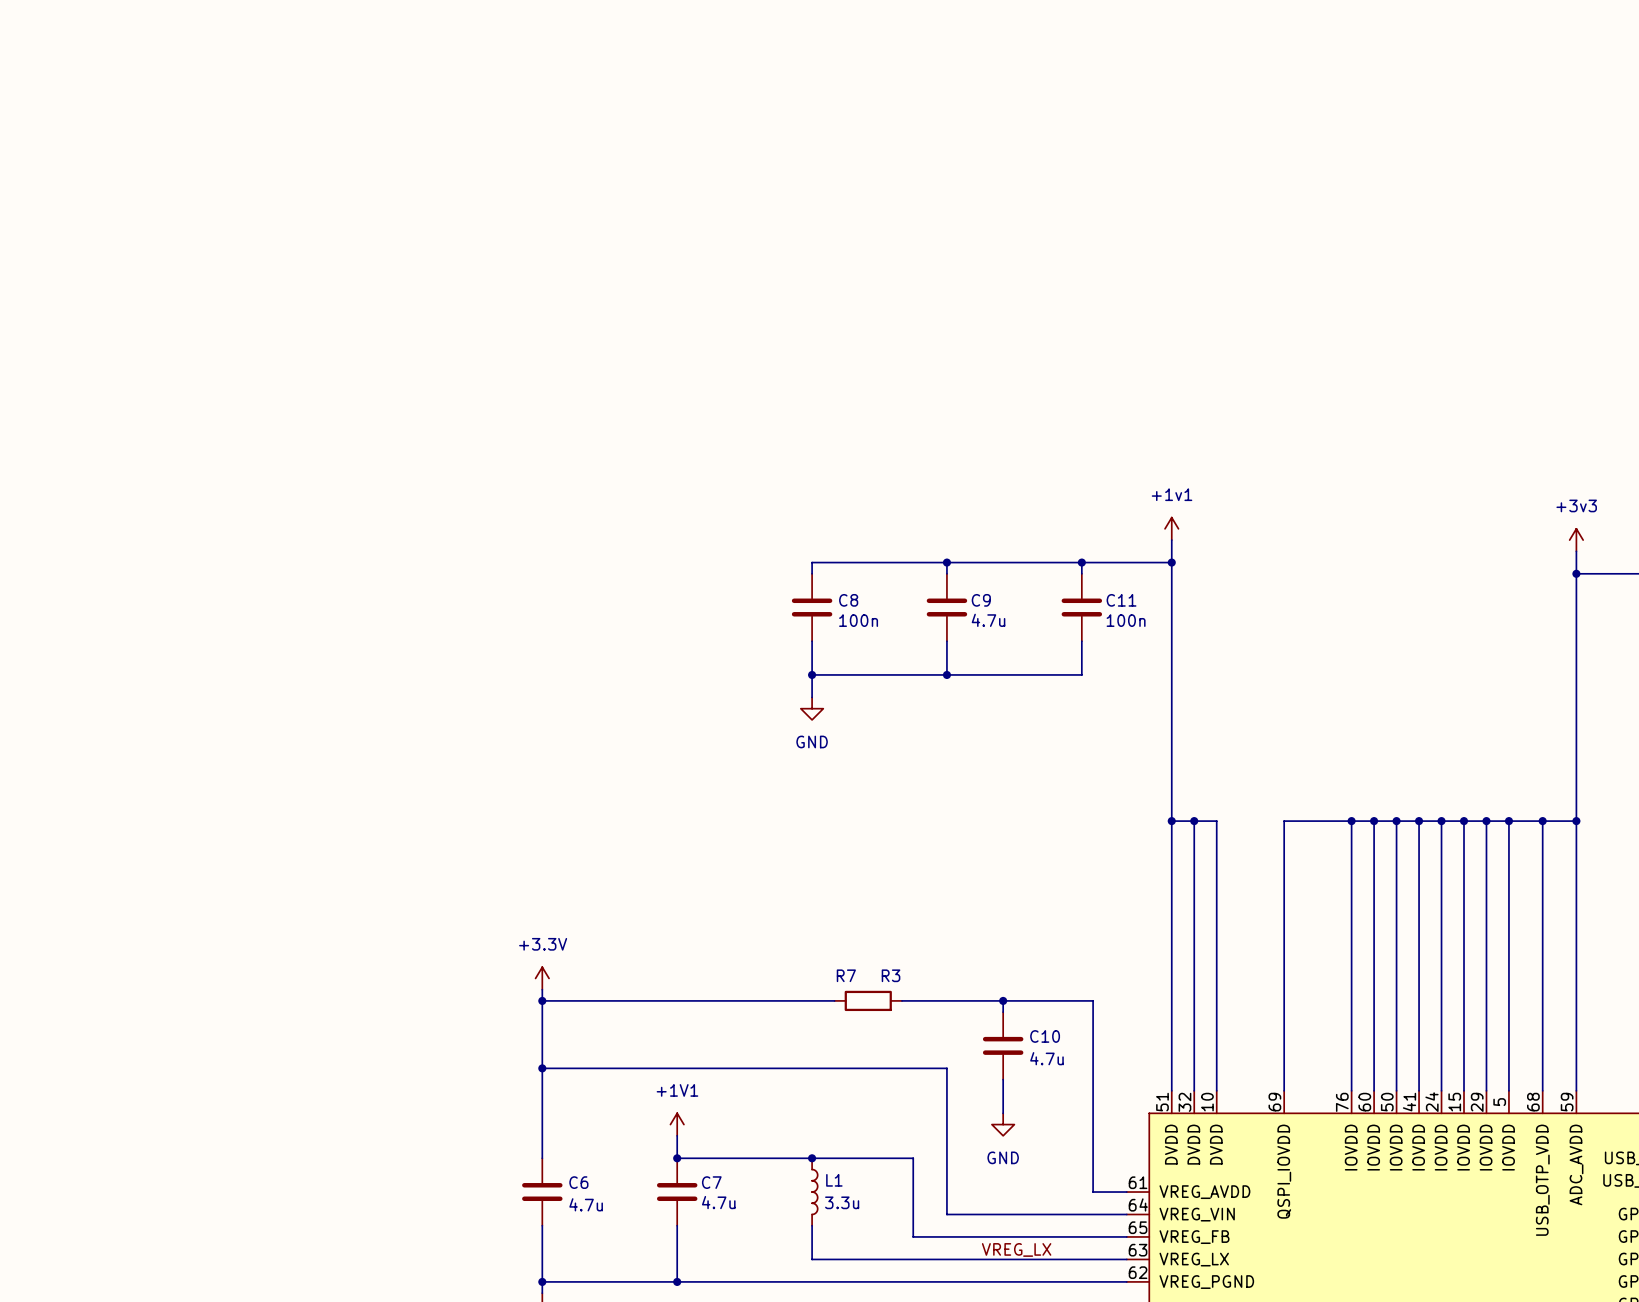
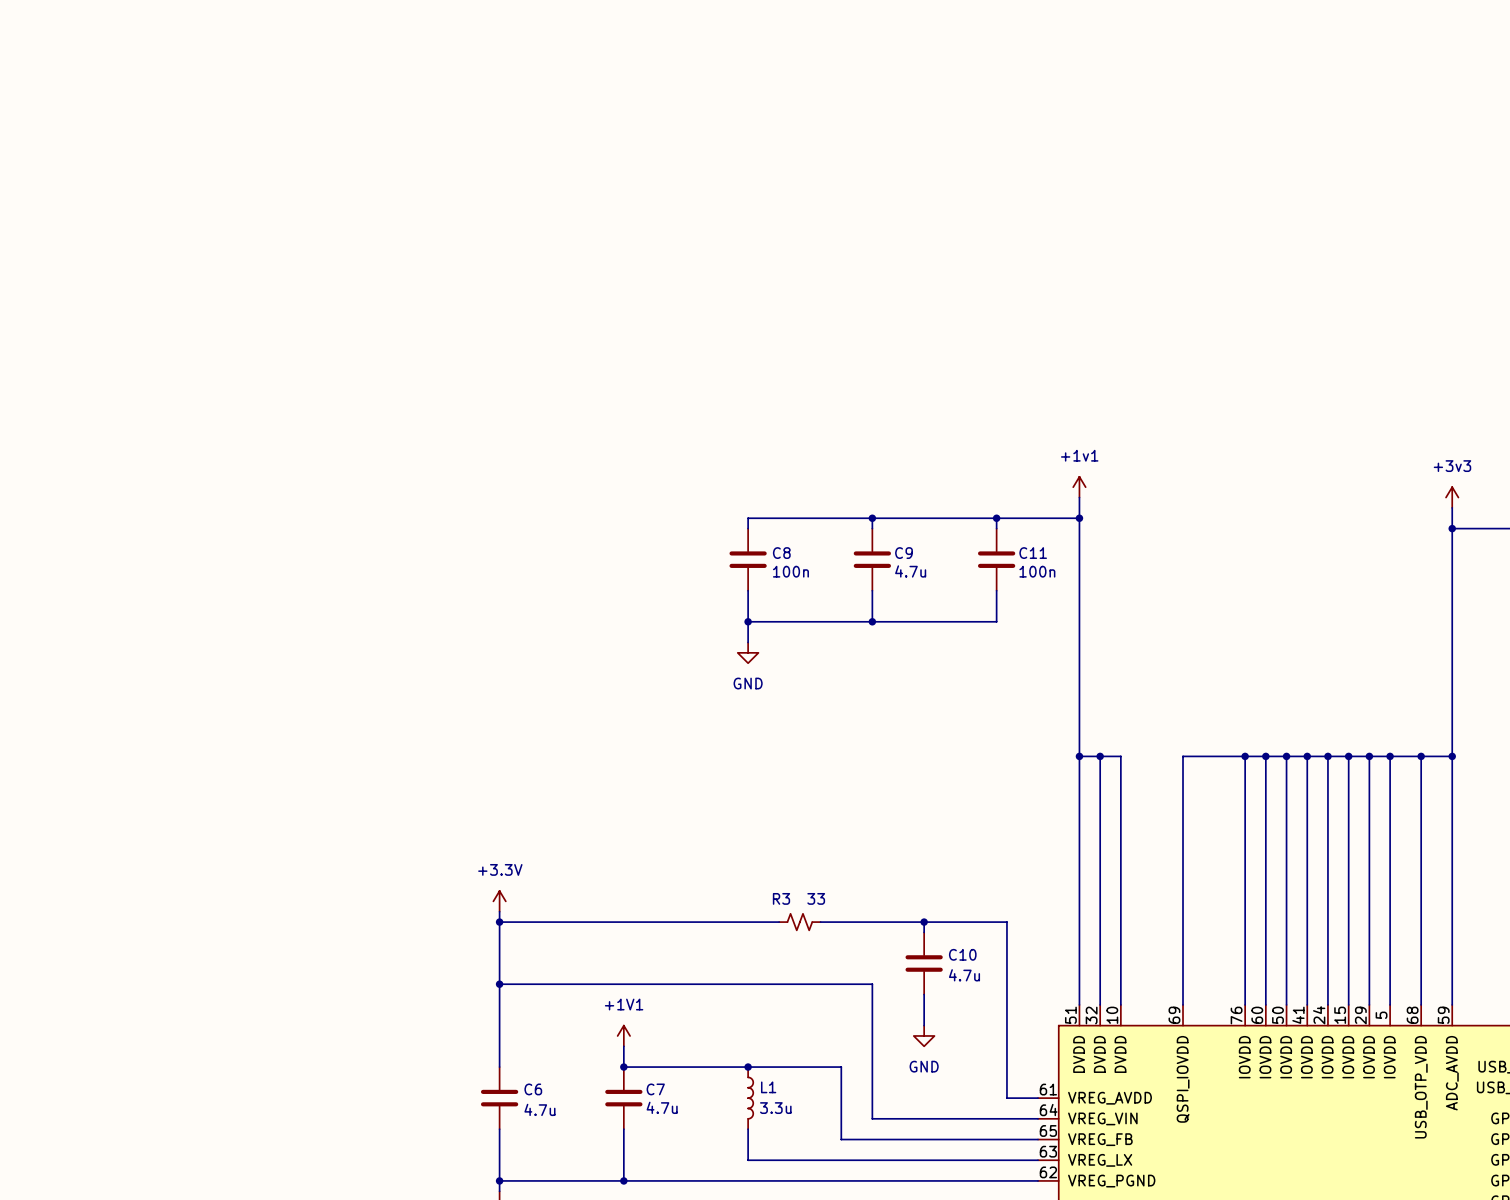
R7: R3 (868, 1000) -> none
R3: none -> 33 (799, 922)
label: VREG_LX (1016, 1249) -> none

